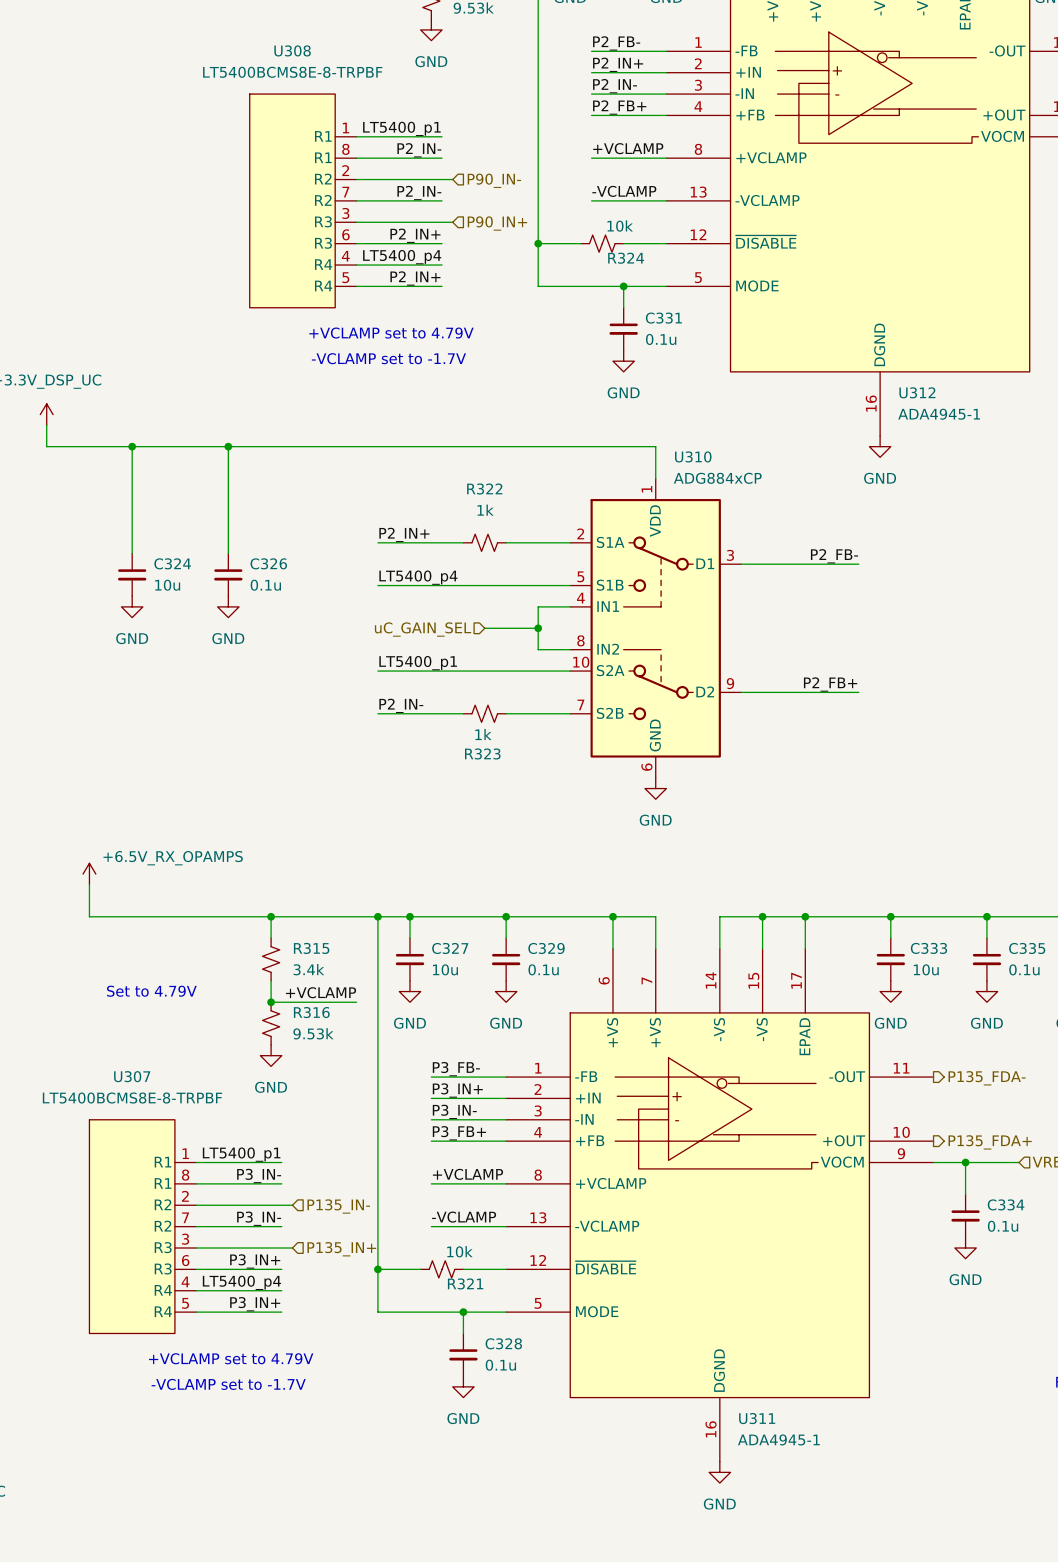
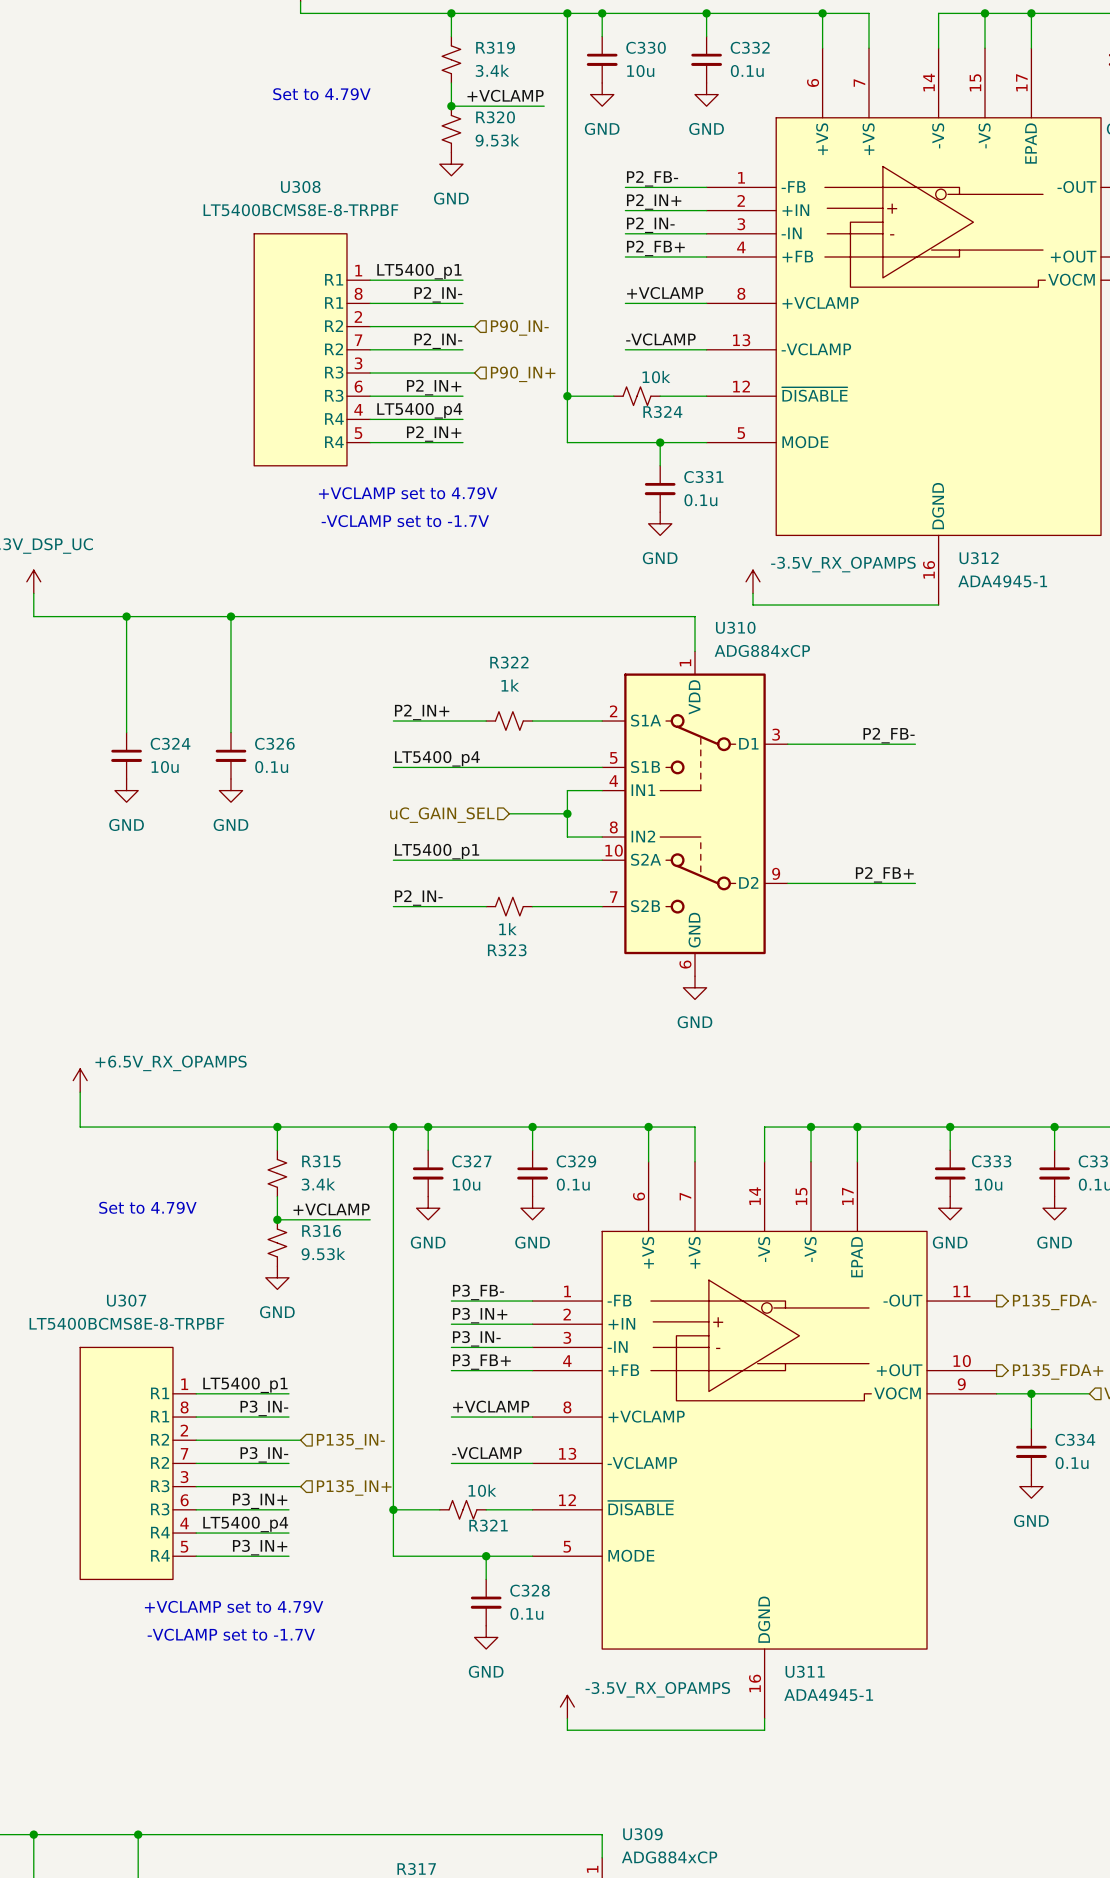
power symbol: none -> -3.5V_RX_OPAMPS (753, 581)
wire: none -> (753, 593) (753, 605) (938, 605)
power symbol: GND (880, 446) -> none
power symbol: none -> -3.5V_RX_OPAMPS (567, 1707)
wire: none -> (567, 1718) (567, 1730) (764, 1730) (764, 1718)
power symbol: GND (719, 1472) -> none

